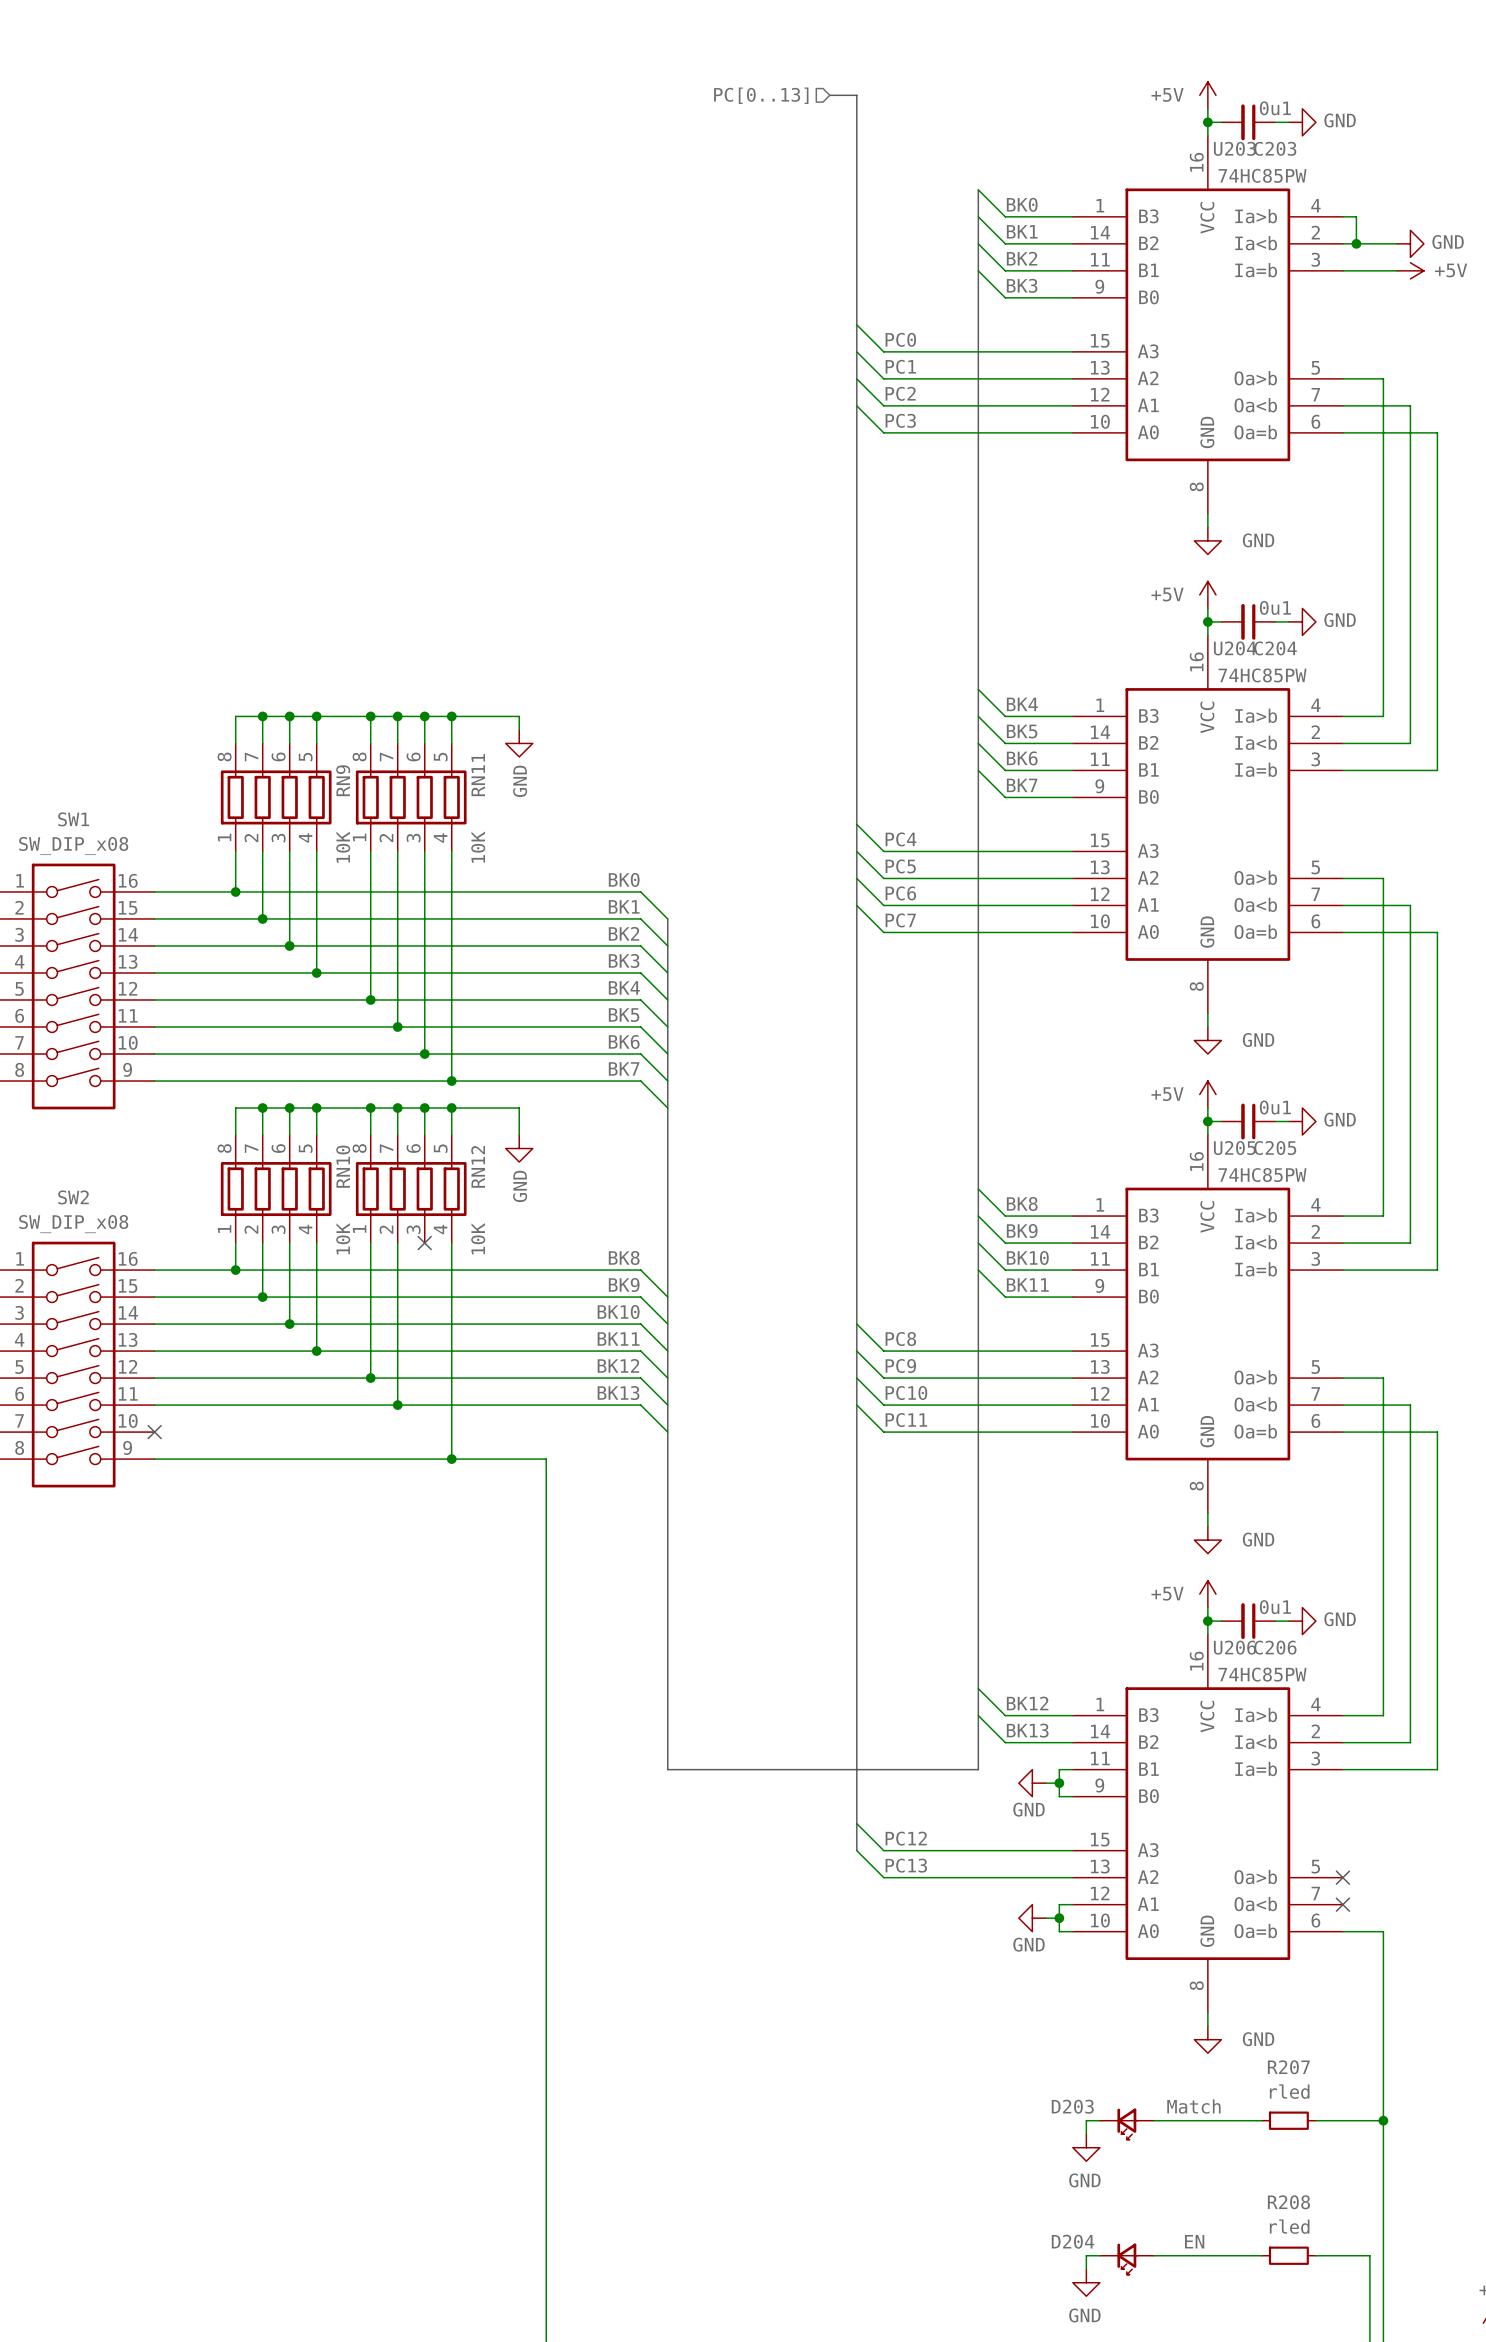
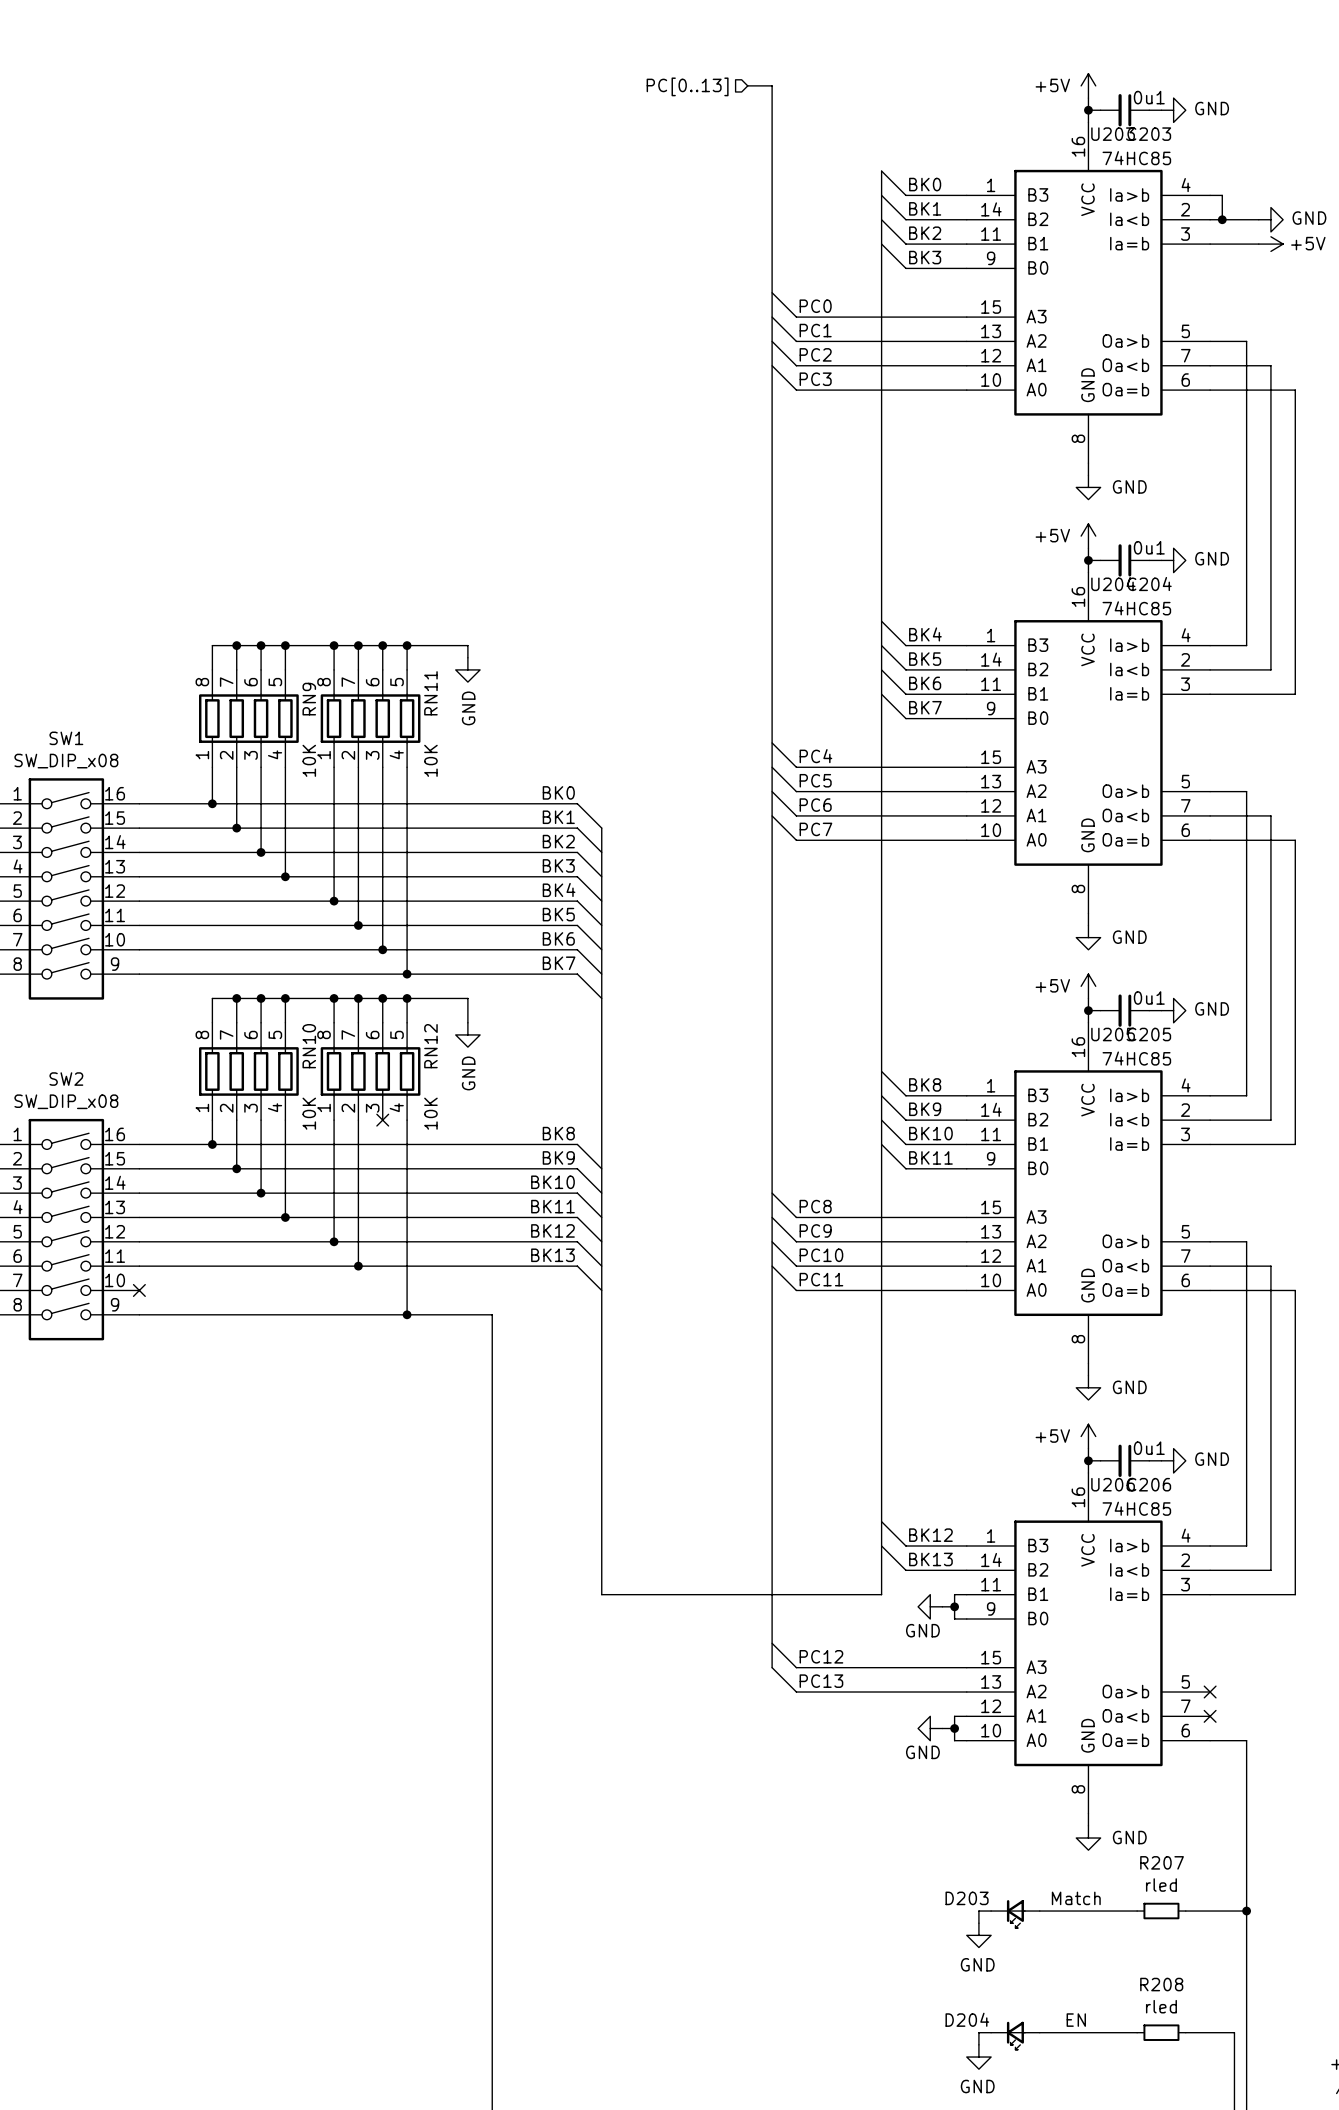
U203 value: 74HC85PW (1262, 175) -> 74HC85 (1136, 158)
U204 value: 74HC85PW (1262, 675) -> 74HC85 (1136, 608)
U205 value: 74HC85PW (1262, 1175) -> 74HC85 (1136, 1058)
U206 value: 74HC85PW (1262, 1674) -> 74HC85 (1136, 1508)

